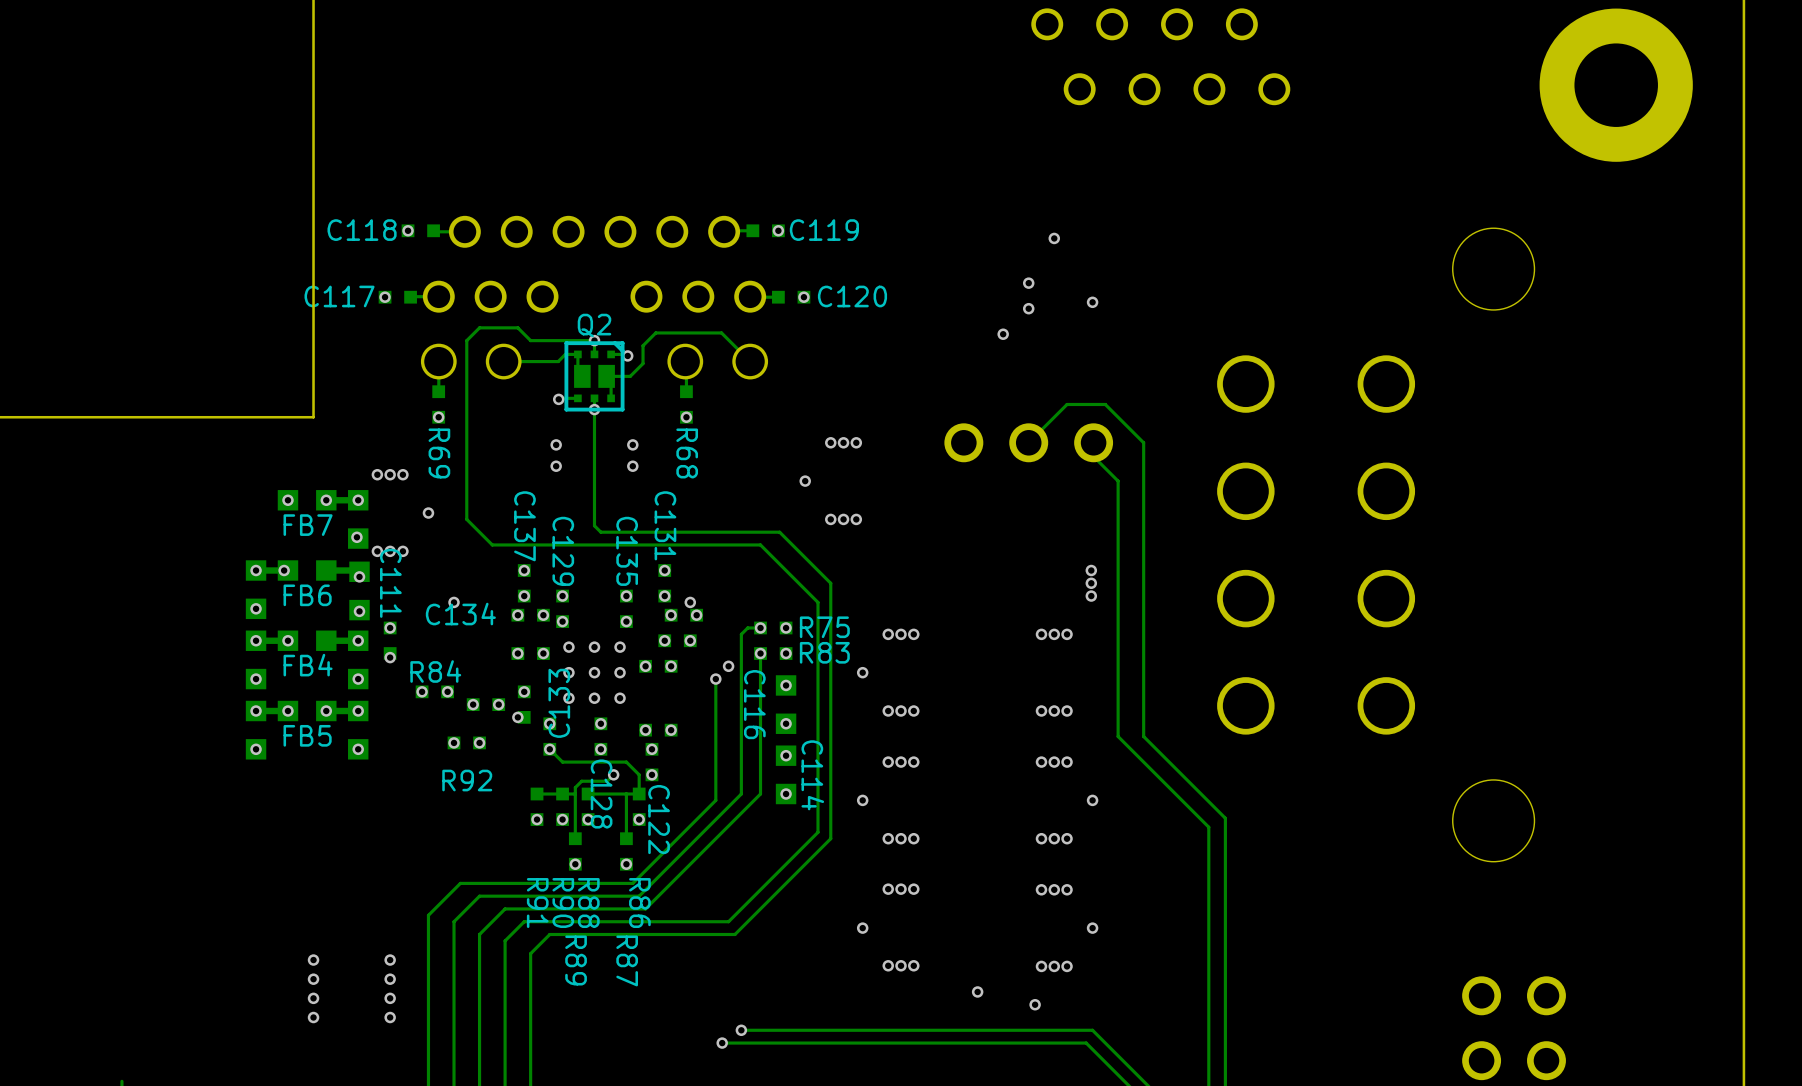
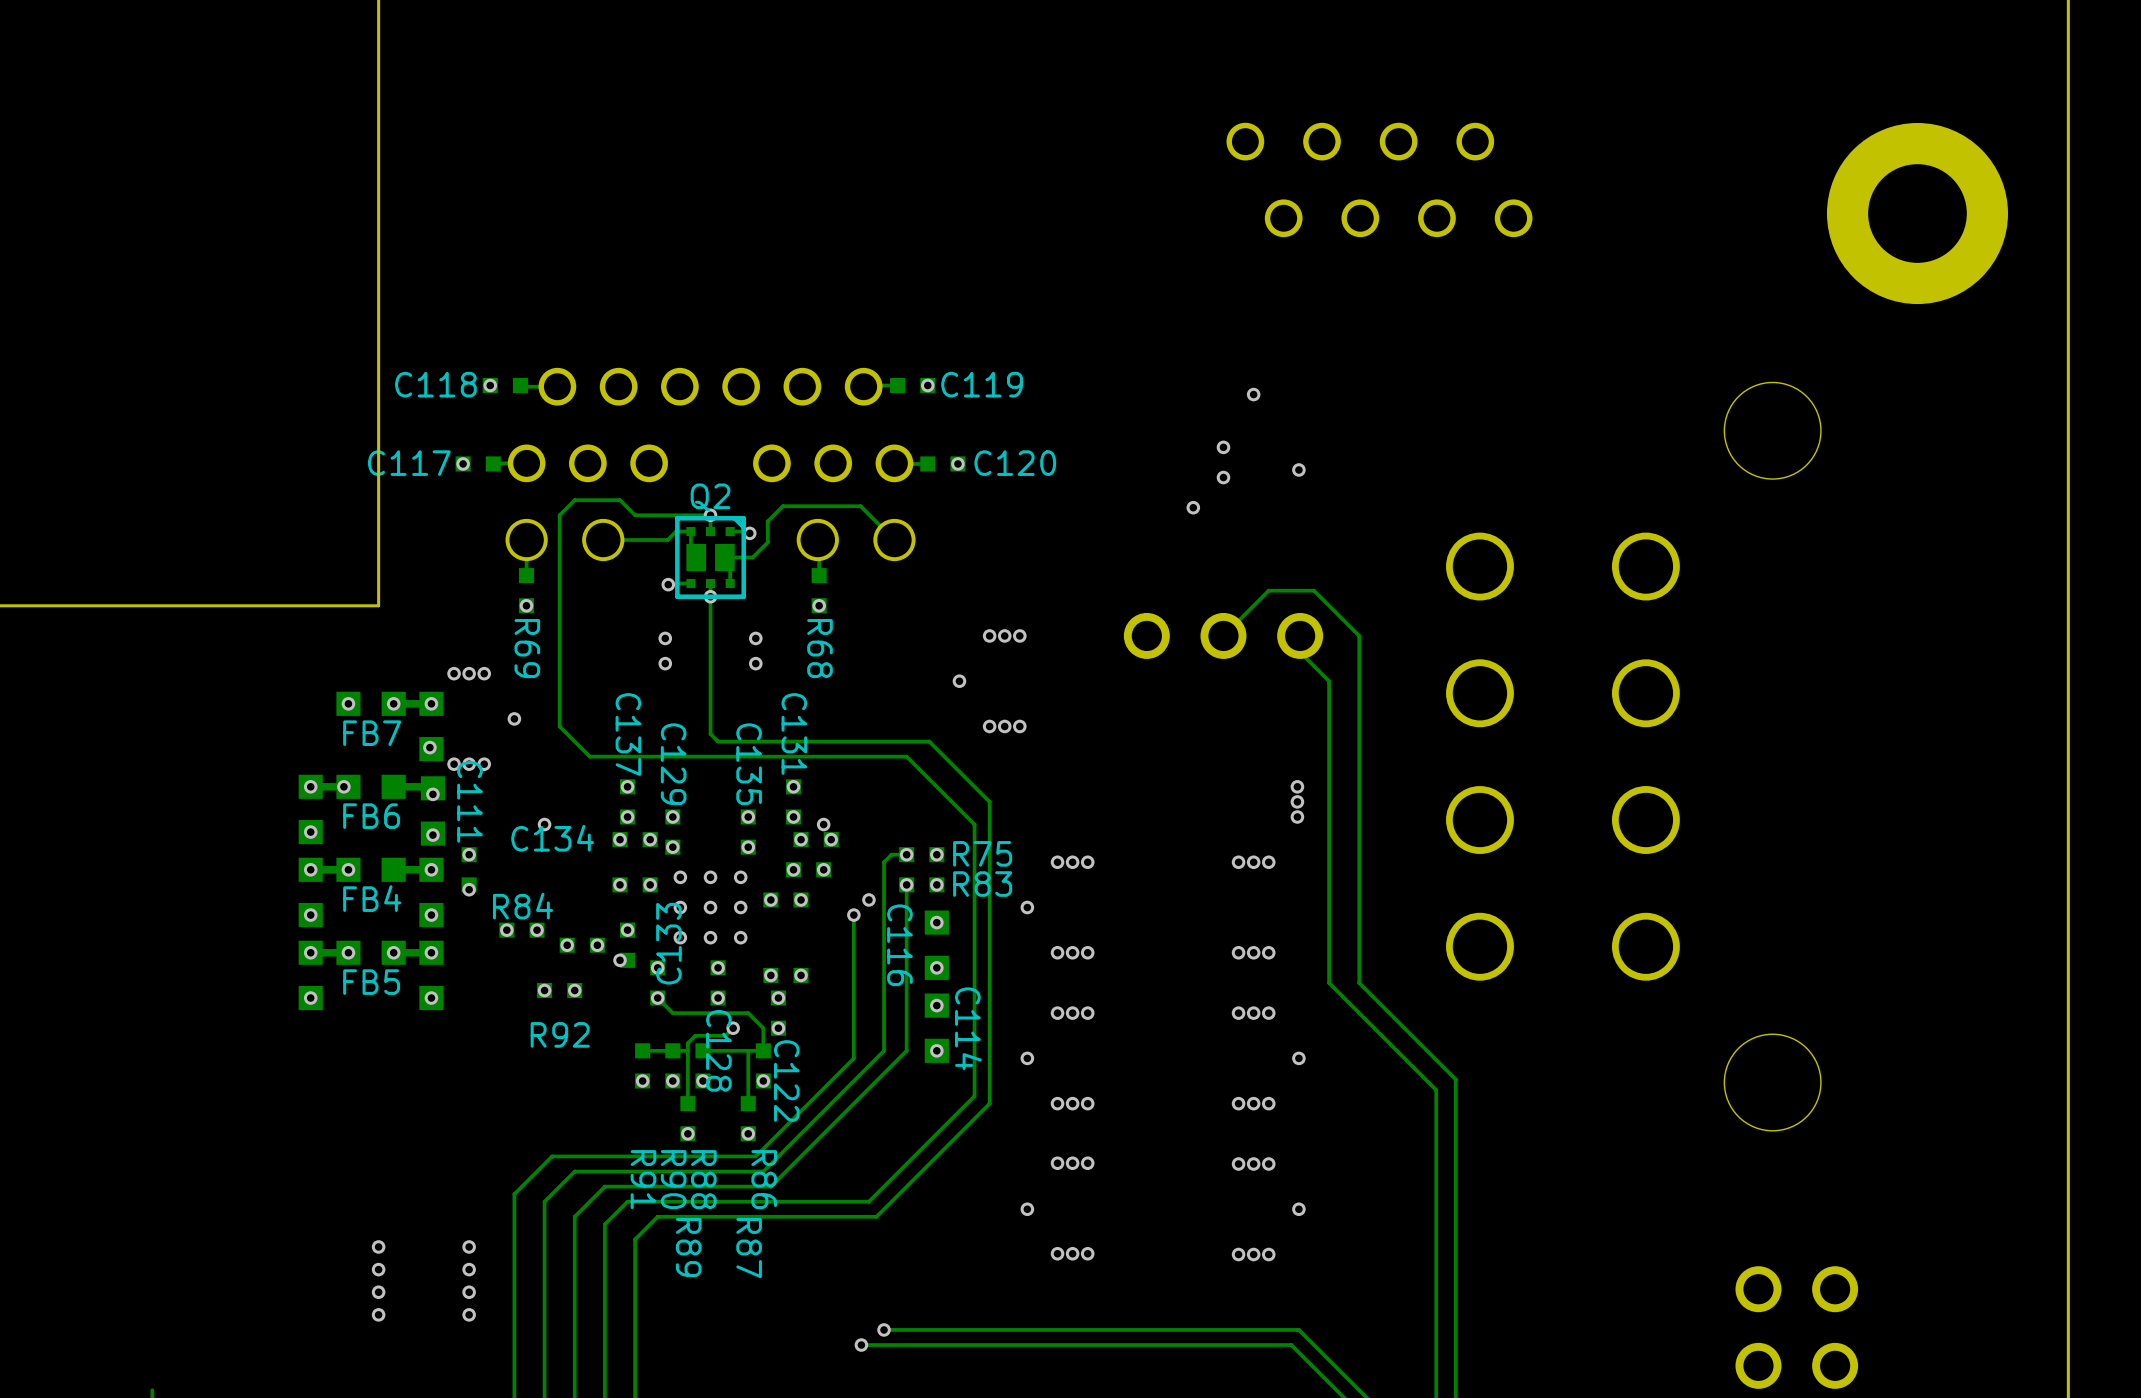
via: (977, 991) -> none
via: (1035, 1004) -> none

